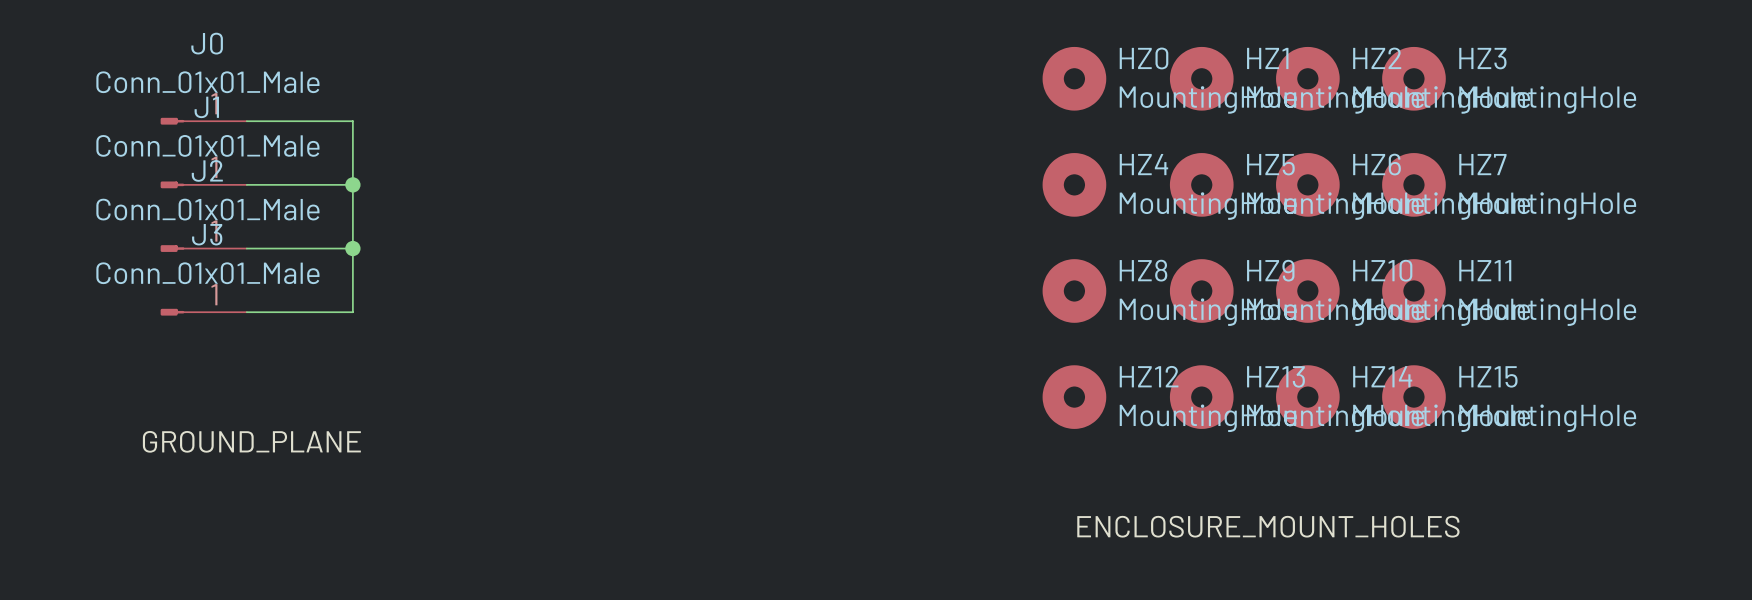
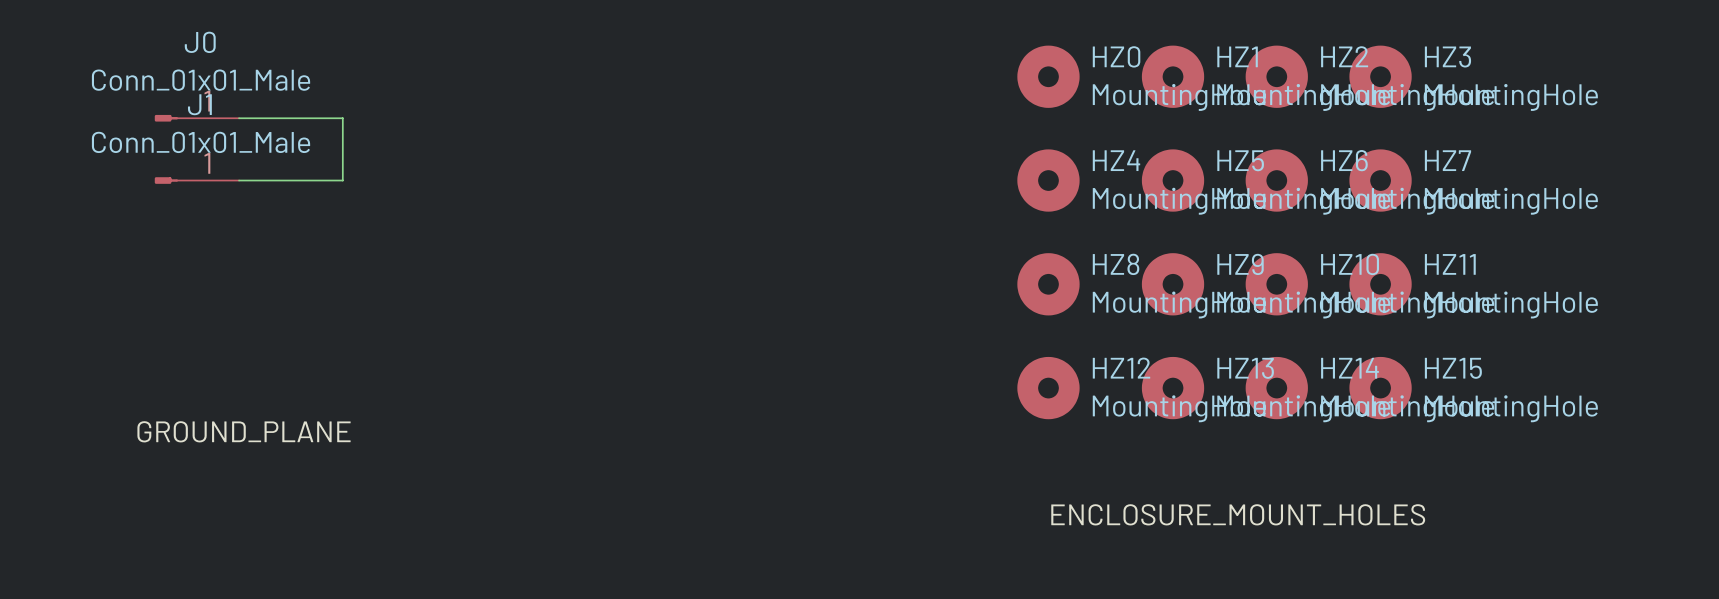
wire: (352, 184) (352, 312) (246, 312) -> none
junction: (352, 184) -> none
J2: Conn_01x01_Male (203, 248) -> none
wire: (246, 248) (352, 248) -> none
junction: (352, 248) -> none
J3: Conn_01x01_Male (203, 312) -> none

